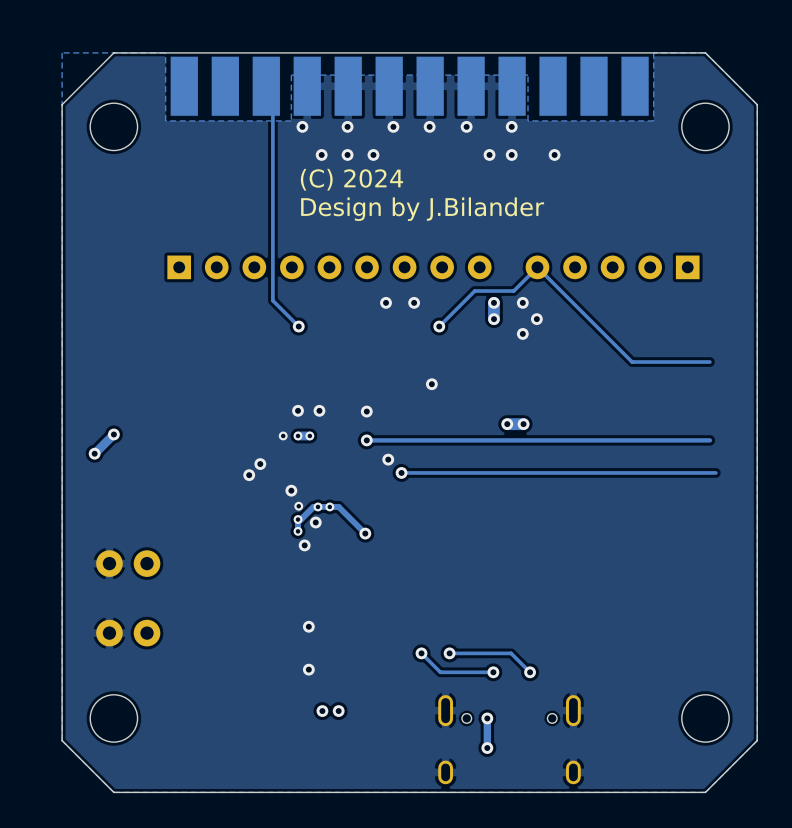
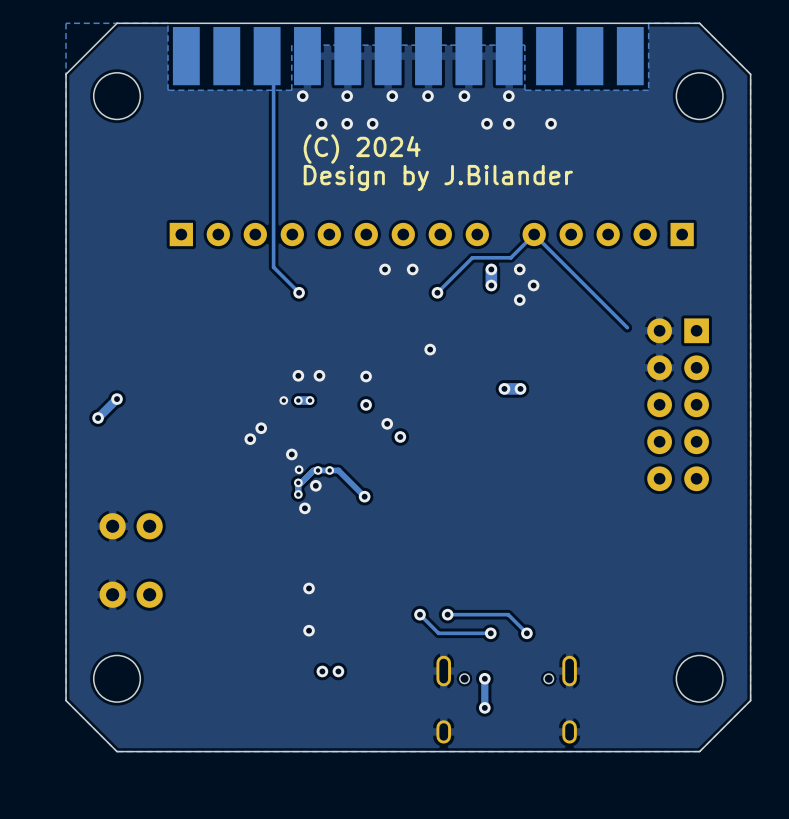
track: (709, 362) (632, 362) -> none
part: none -> (678, 404)
track: (709, 440) (366, 440) -> none
track: (715, 472) (401, 472) -> none

